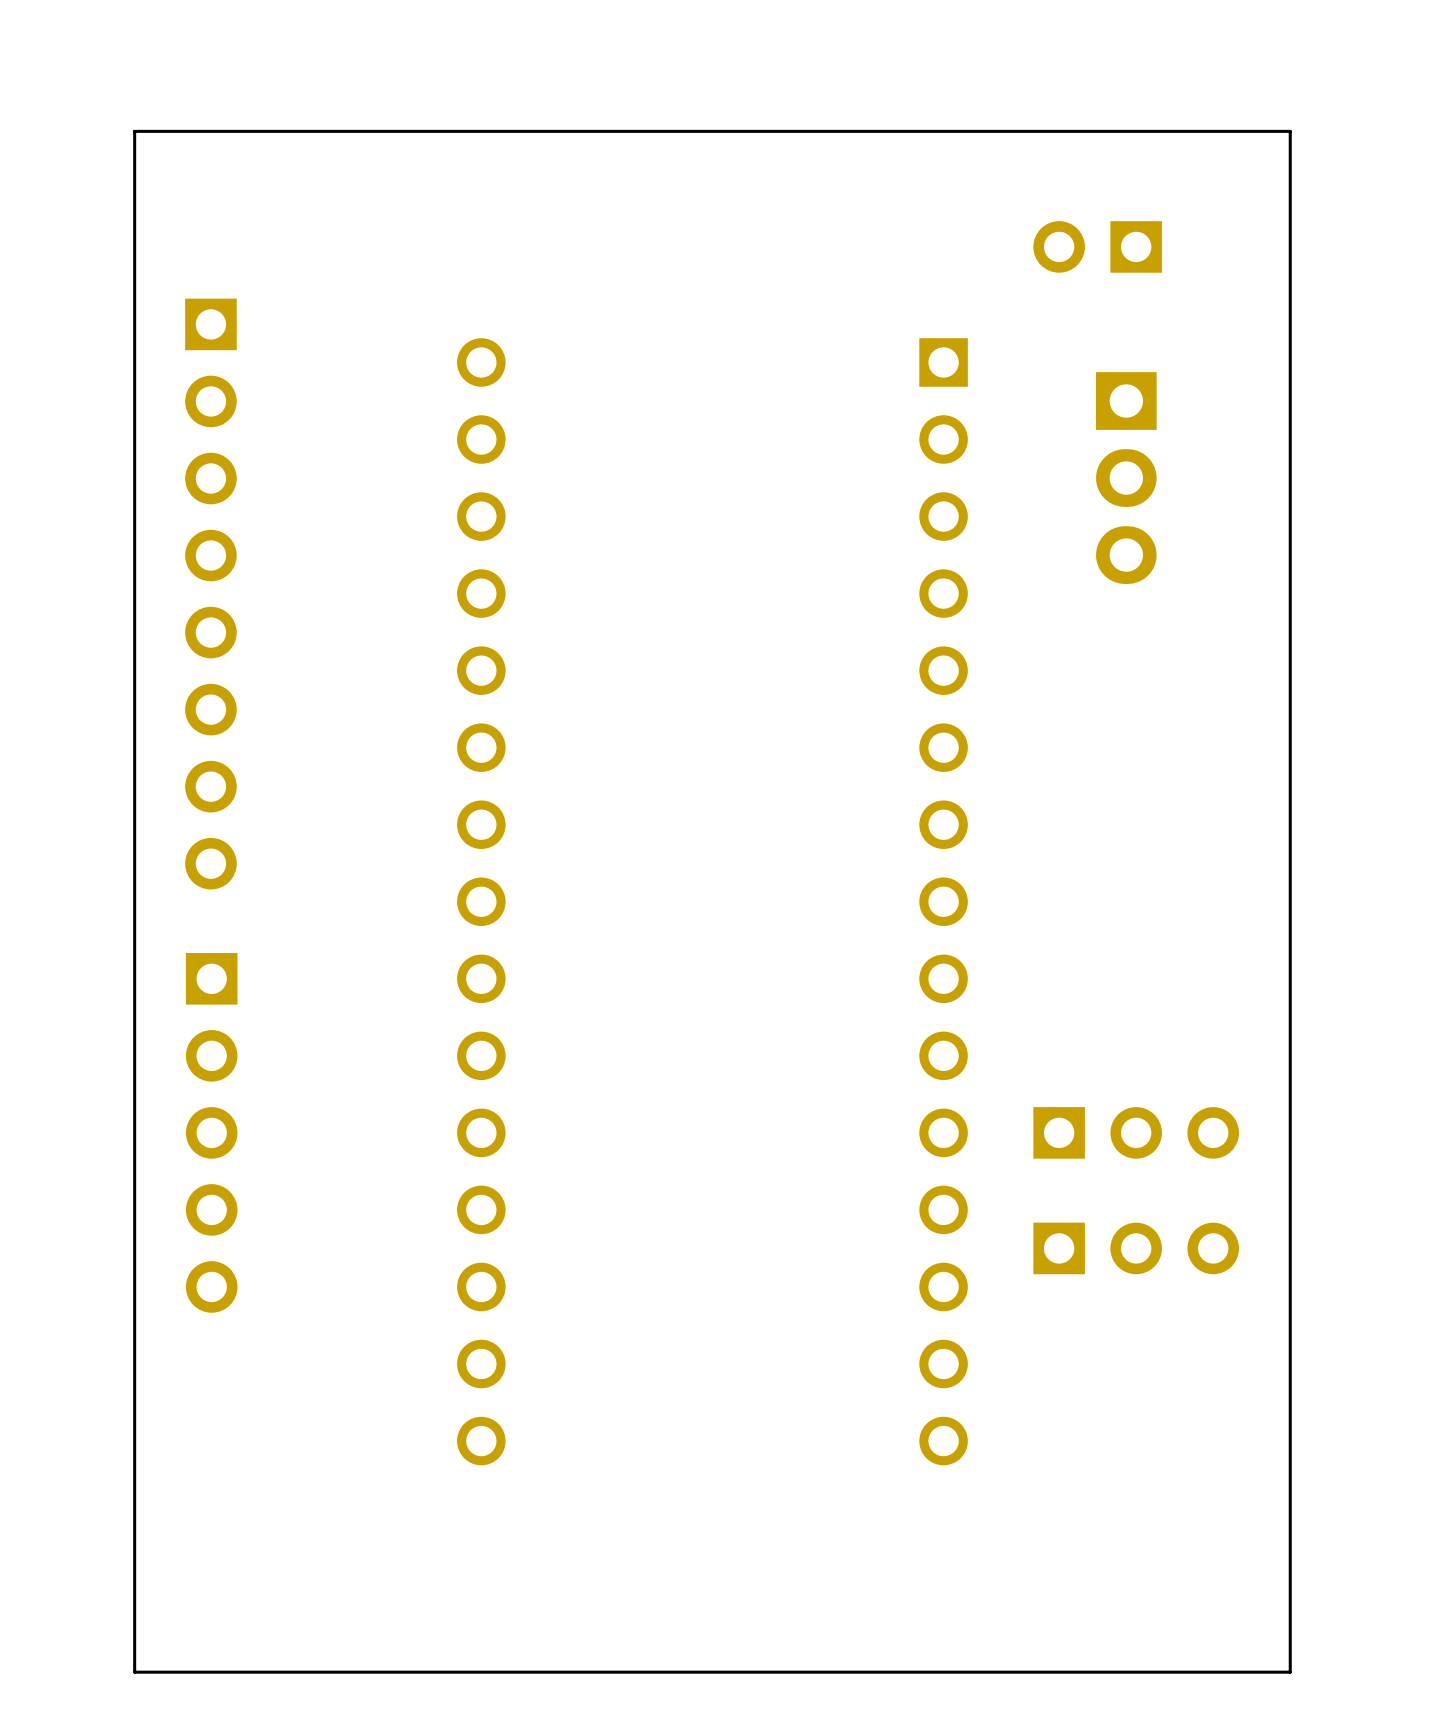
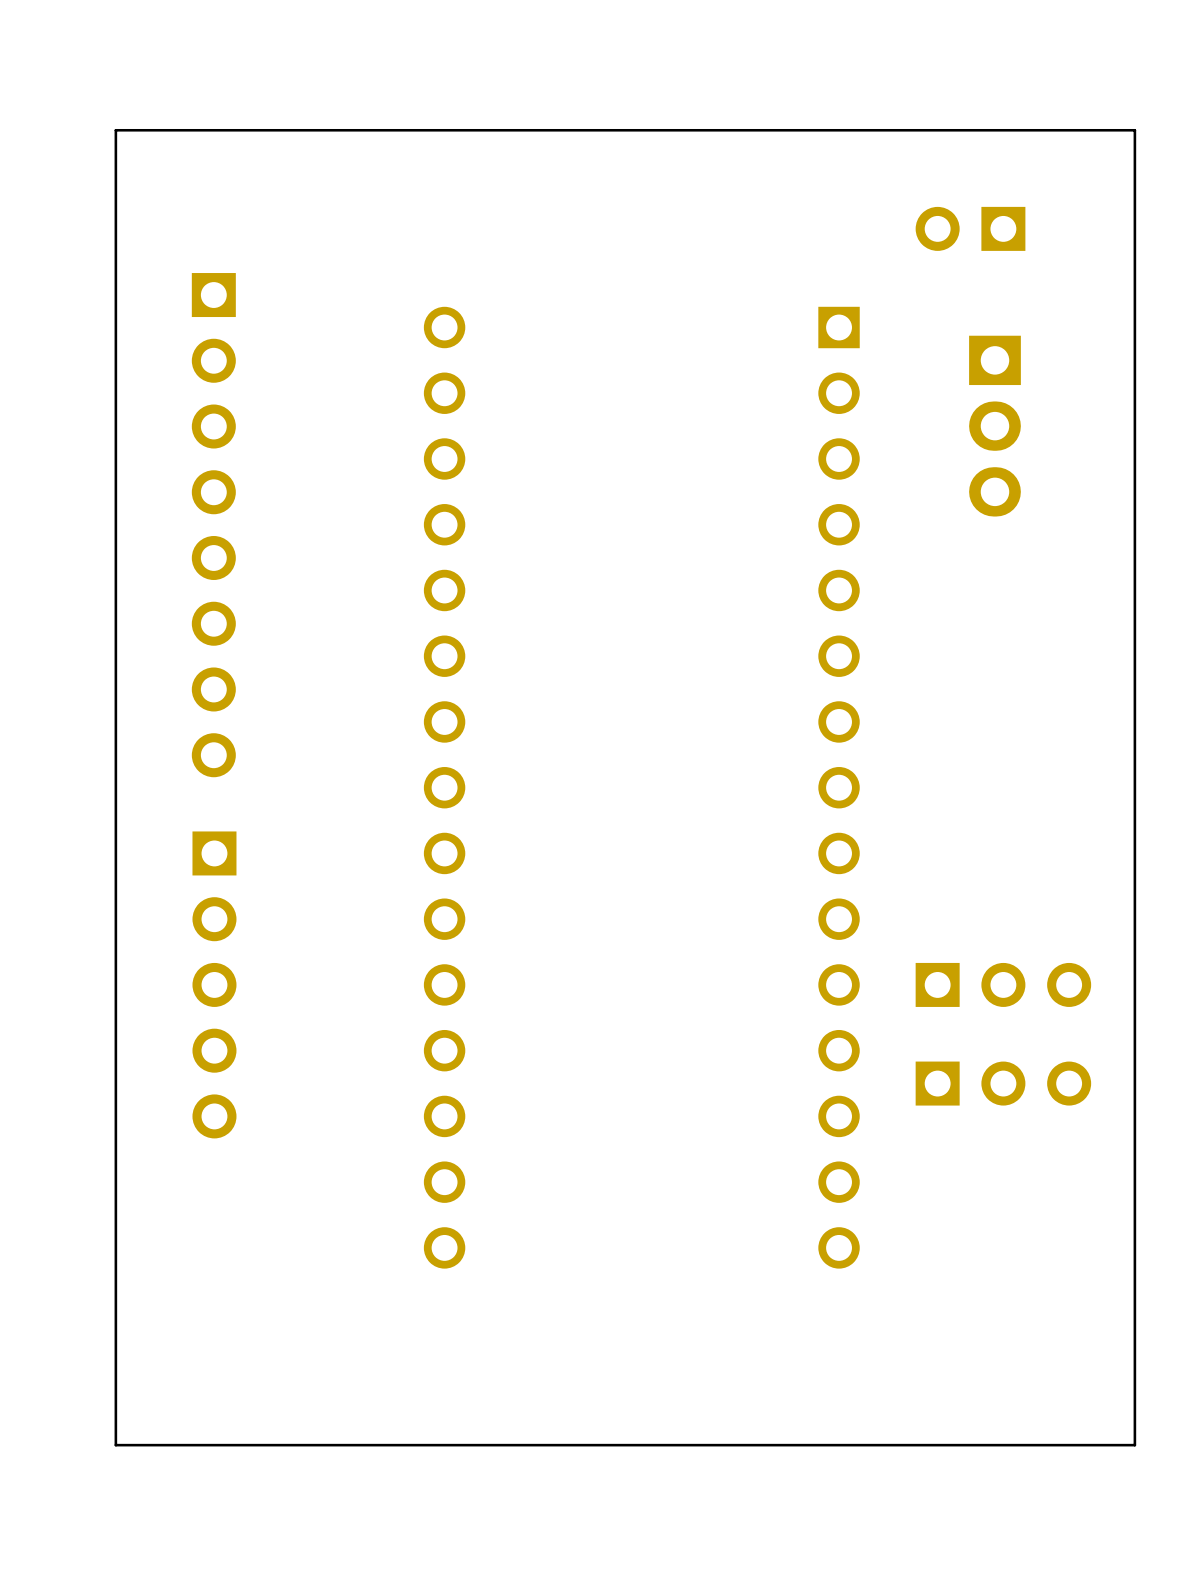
board edge: (134, 131) (134, 1672) -> (148, 130) (115, 130) (115, 1445) (148, 1445)

